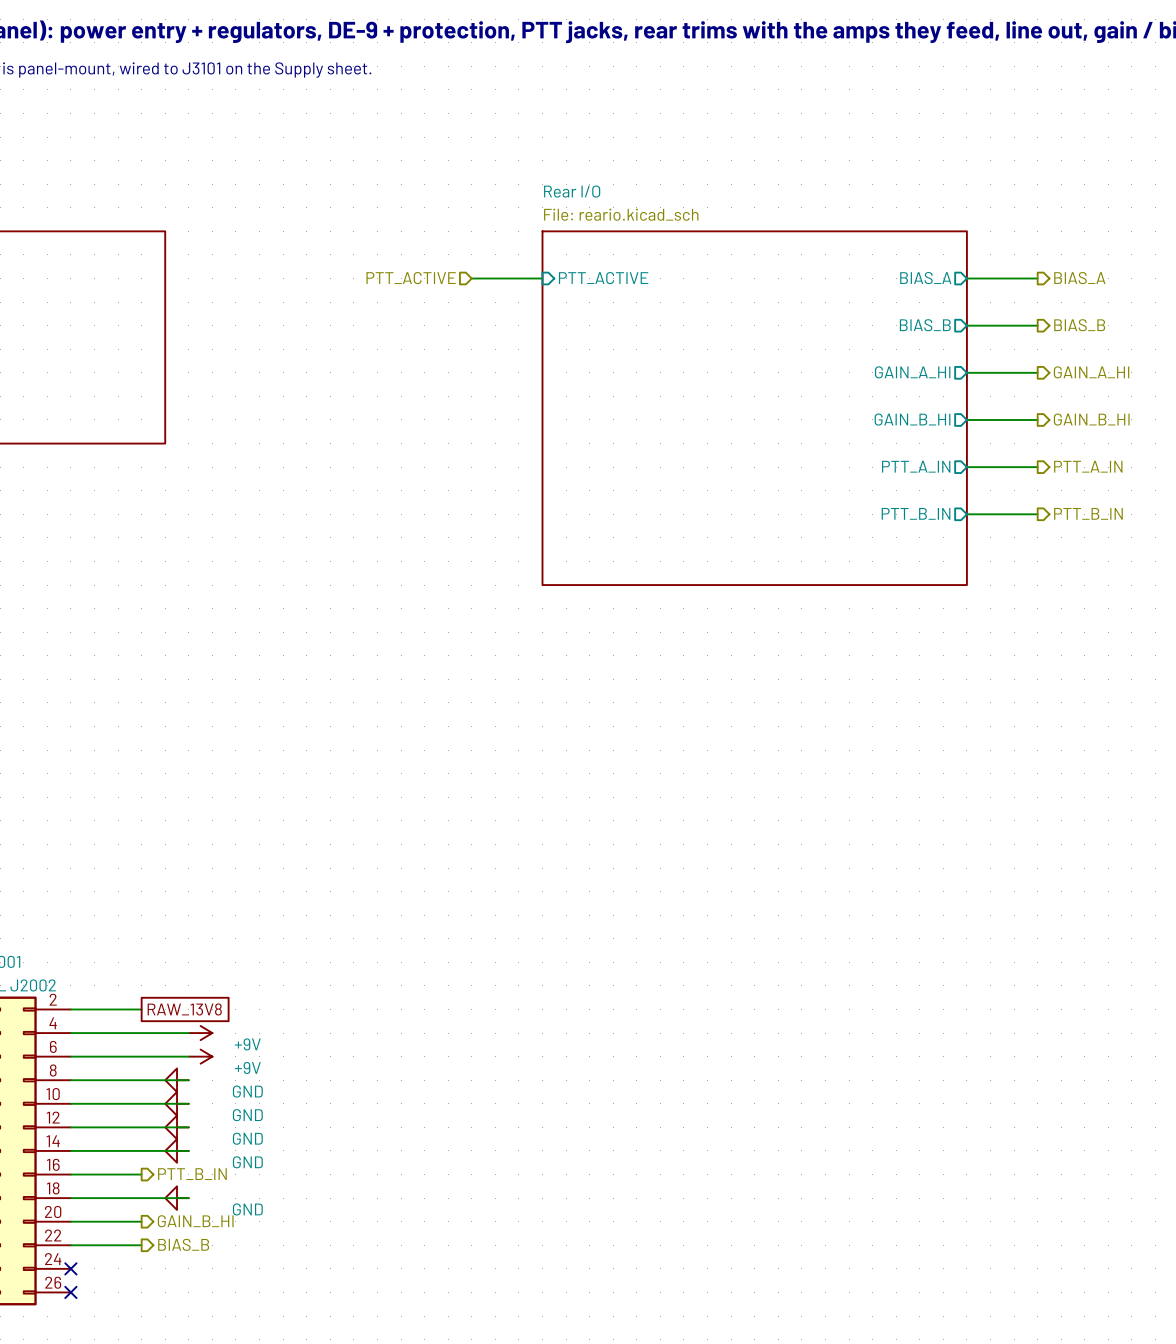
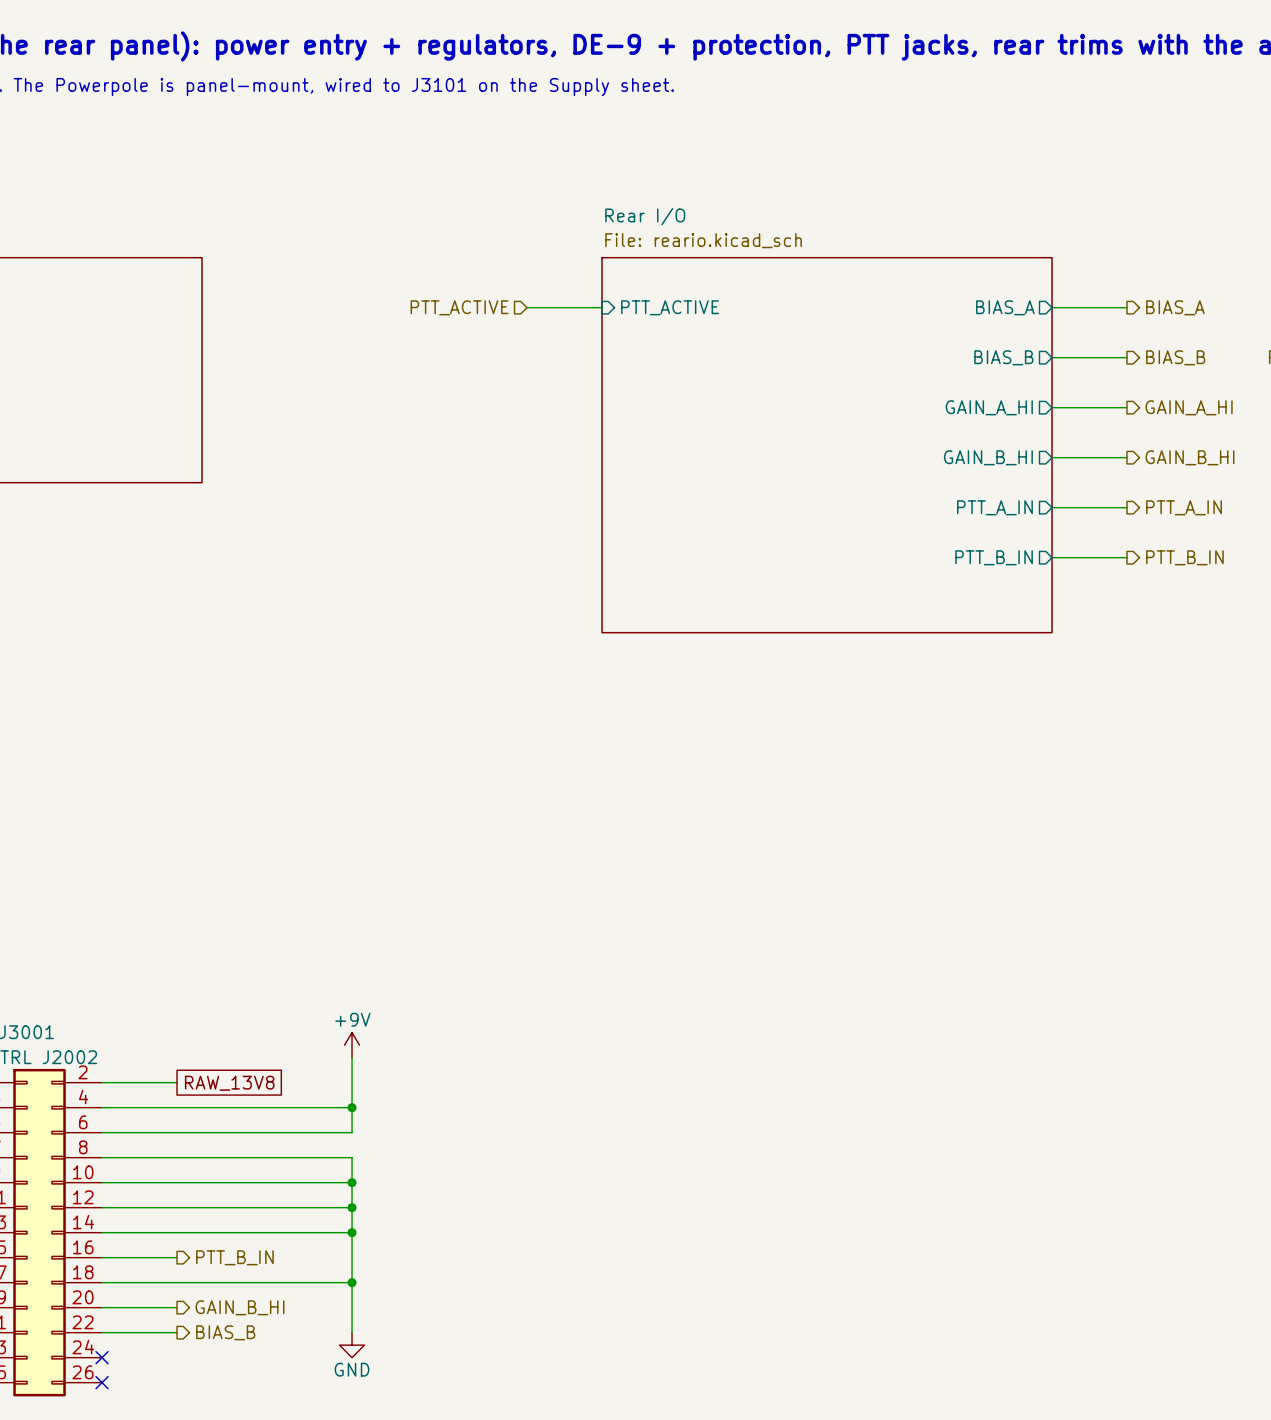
power symbol: none -> +9V (352, 1045)
wire: none -> (352, 1057) (352, 1132) (227, 1132)
wire: none -> (227, 1107) (352, 1107)
power symbol: +9V (200, 1033) -> none
junction: none -> (352, 1107)
power symbol: +9V (200, 1056) -> none
power symbol: GND (177, 1080) -> none
wire: none -> (227, 1157) (352, 1157) (352, 1332)
power symbol: GND (177, 1103) -> none
wire: none -> (227, 1182) (352, 1182)
junction: none -> (352, 1182)
power symbol: GND (177, 1127) -> none
wire: none -> (227, 1207) (352, 1207)
junction: none -> (352, 1207)
power symbol: GND (177, 1150) -> none
wire: none -> (227, 1232) (352, 1232)
junction: none -> (352, 1232)
power symbol: GND (177, 1198) -> none
wire: none -> (227, 1282) (352, 1282)
junction: none -> (352, 1282)
power symbol: none -> GND (352, 1345)

